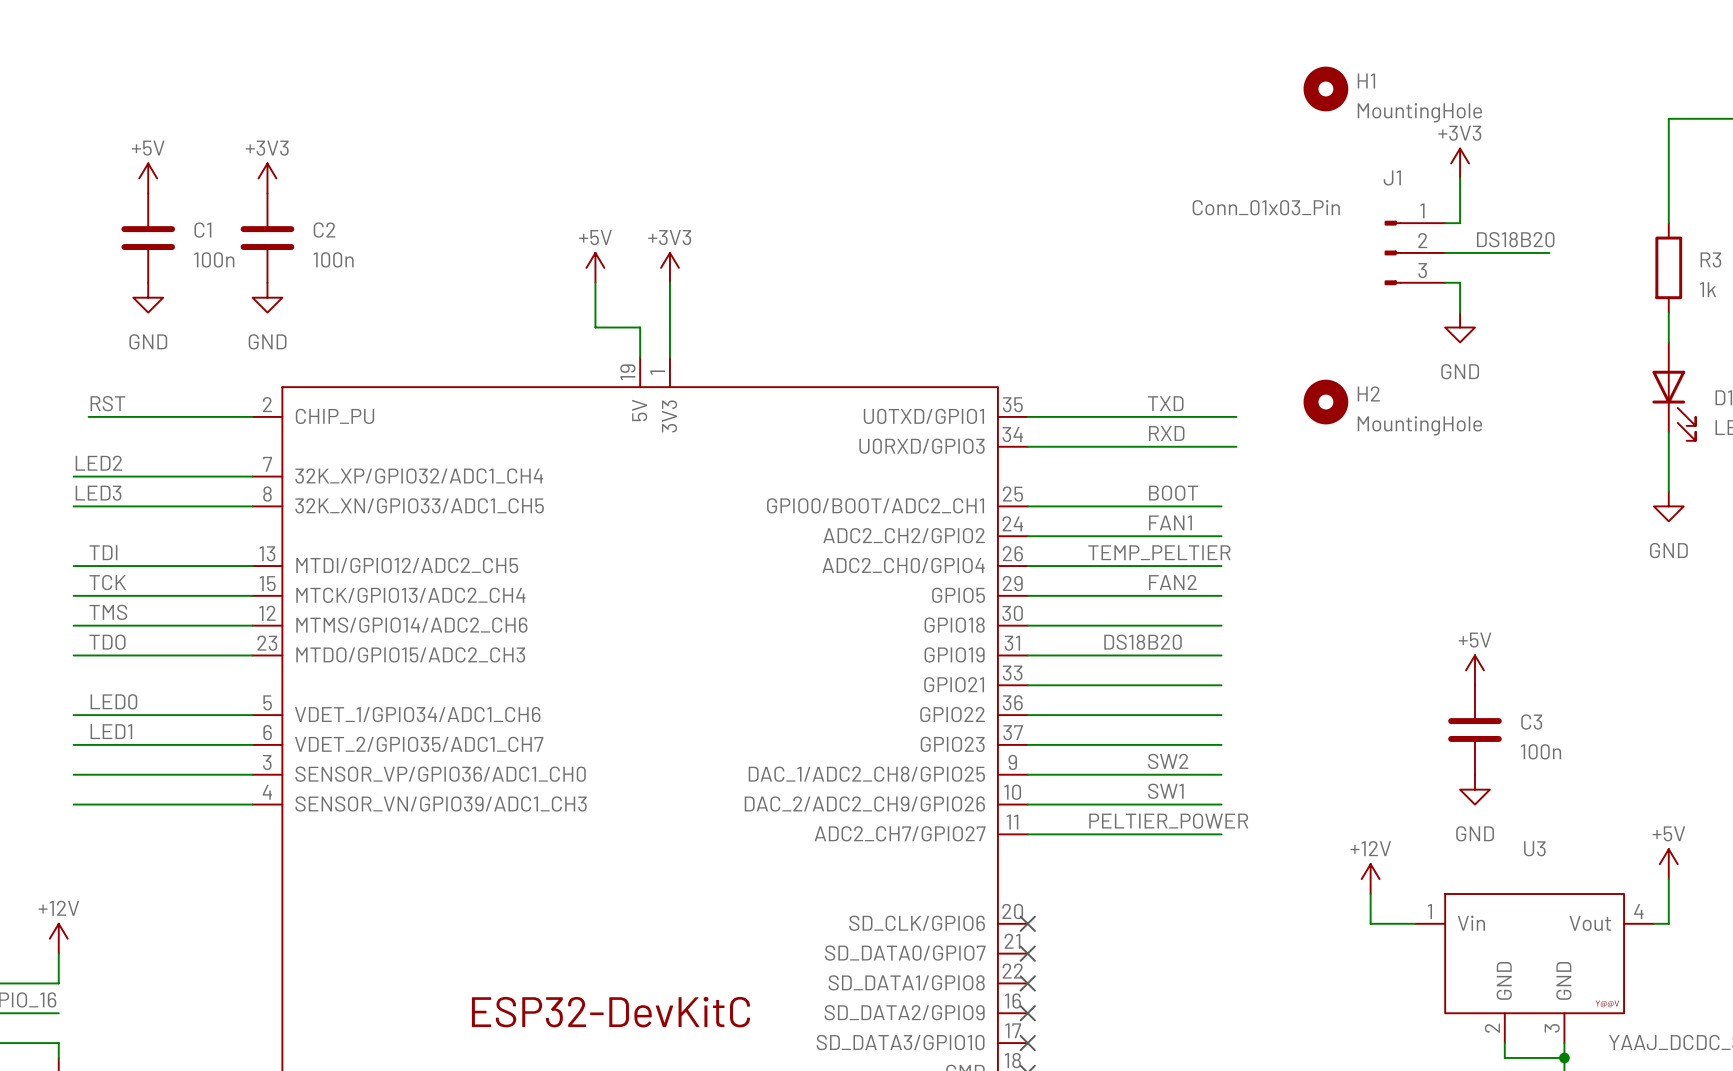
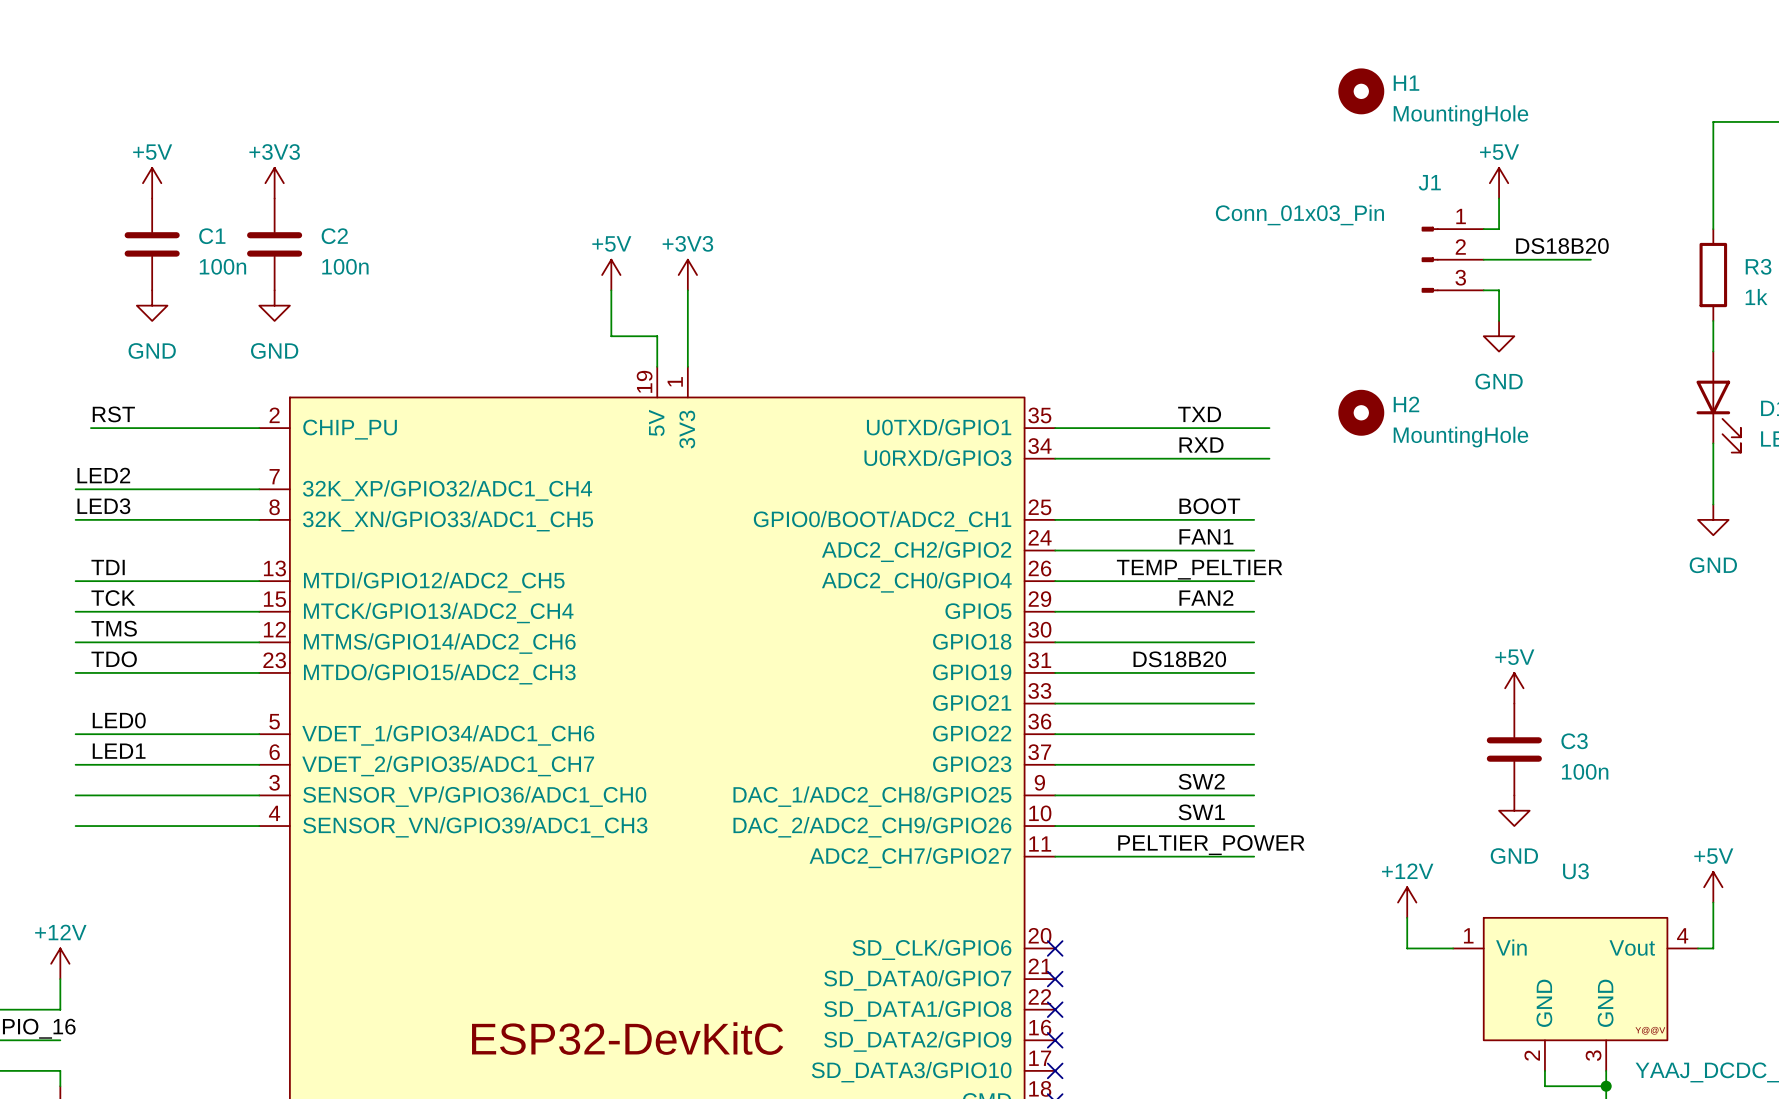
power symbol: +3V3 (1460, 163) -> none
power symbol: none -> +5V (1499, 183)

